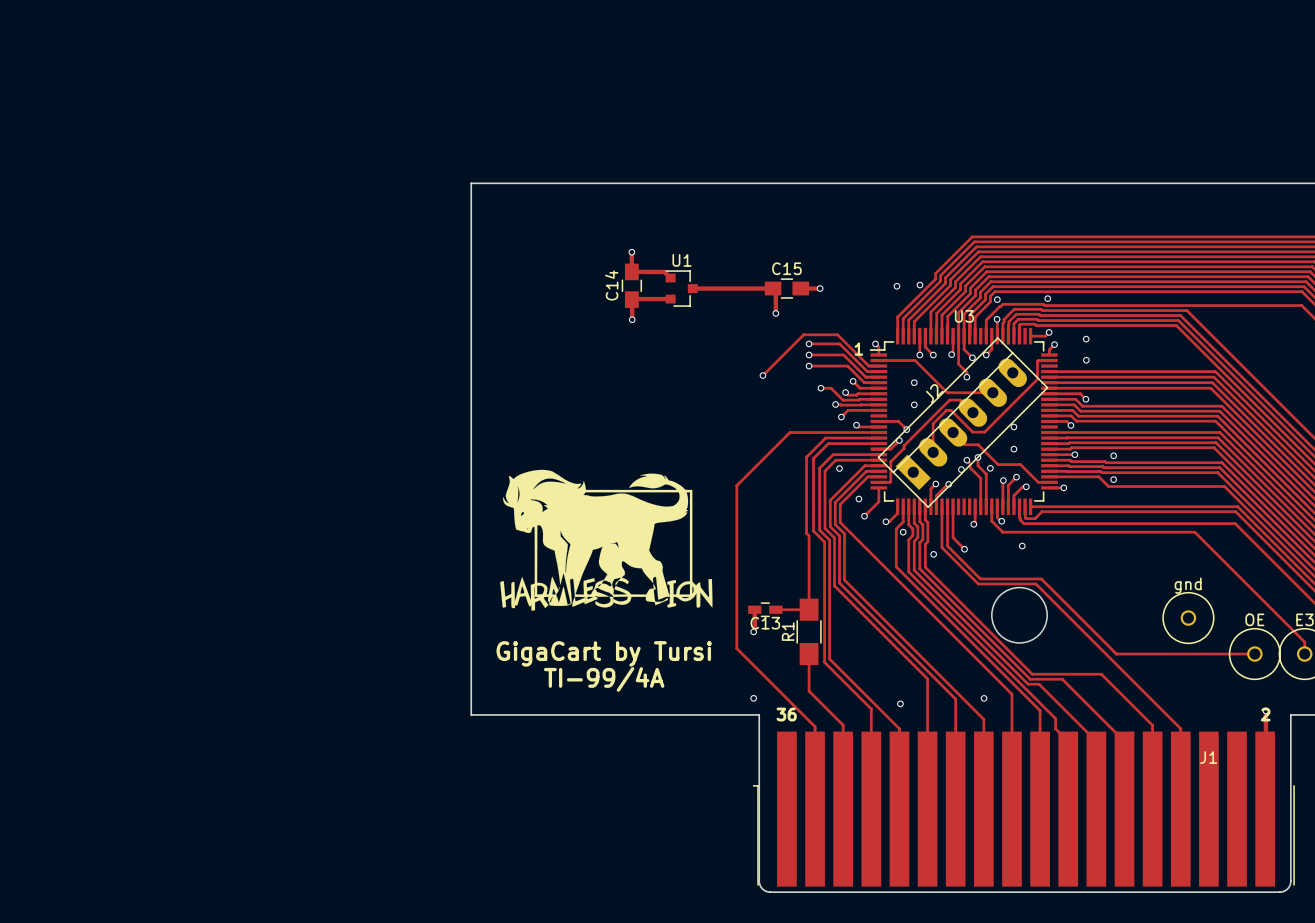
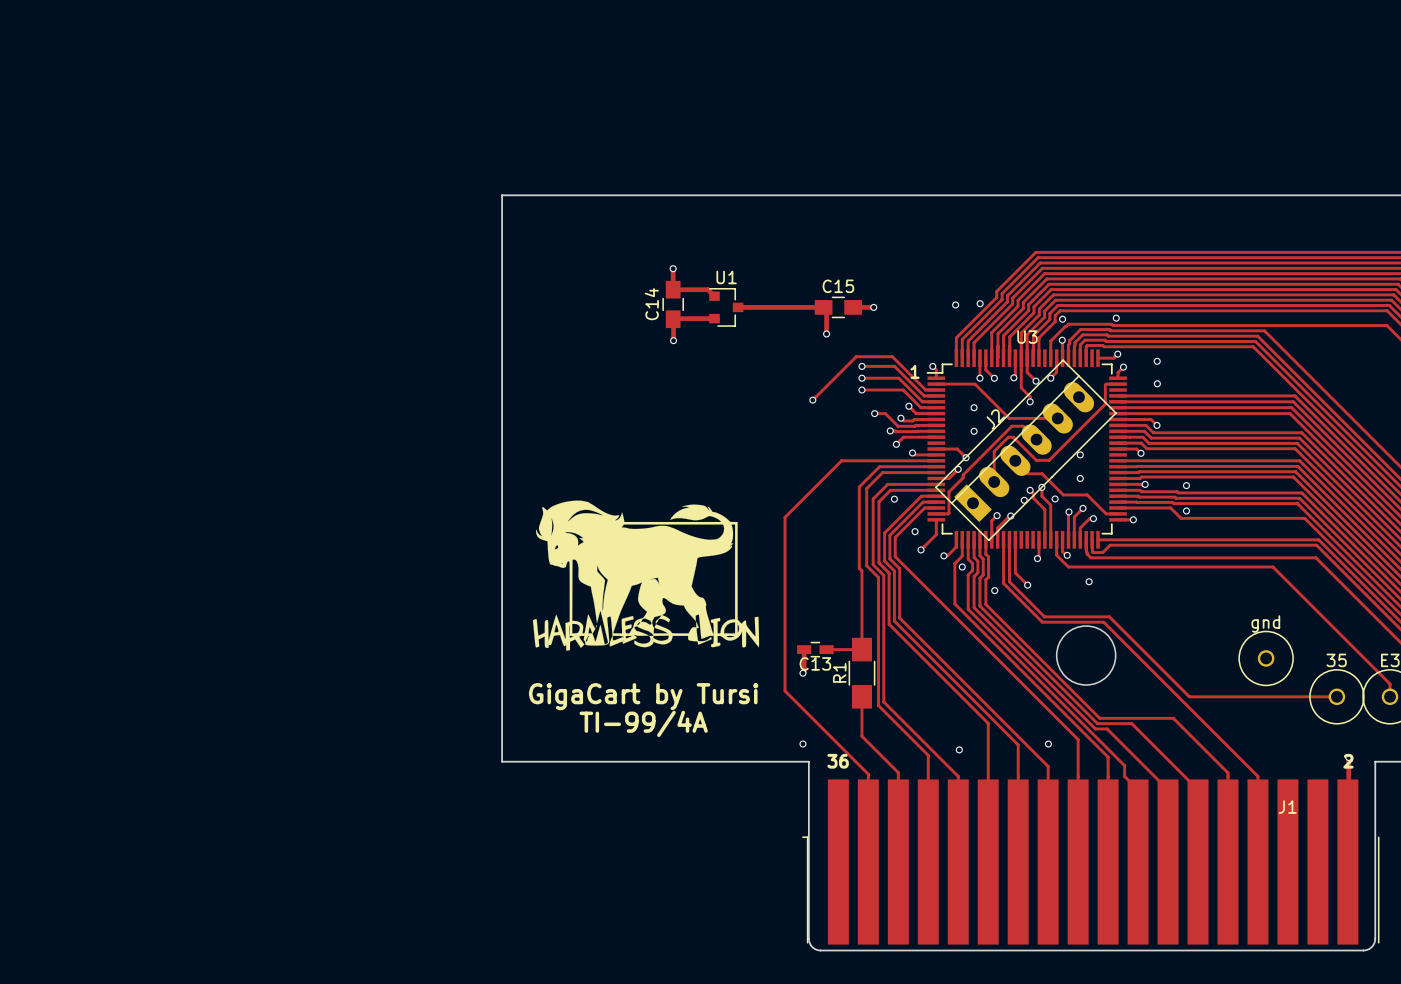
OE name: OE (1254, 619) -> 35 (1336, 660)

